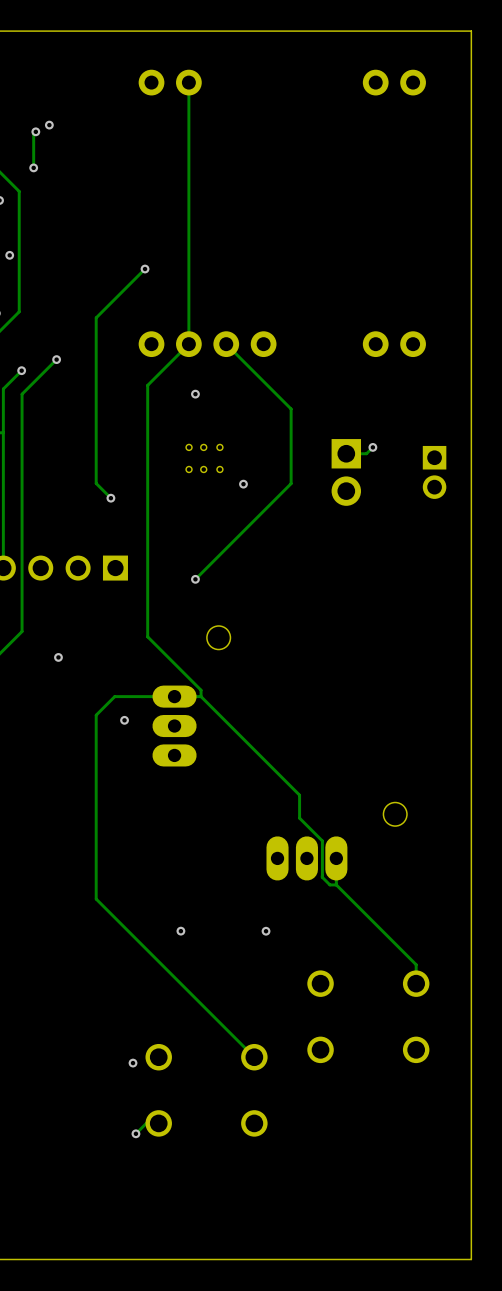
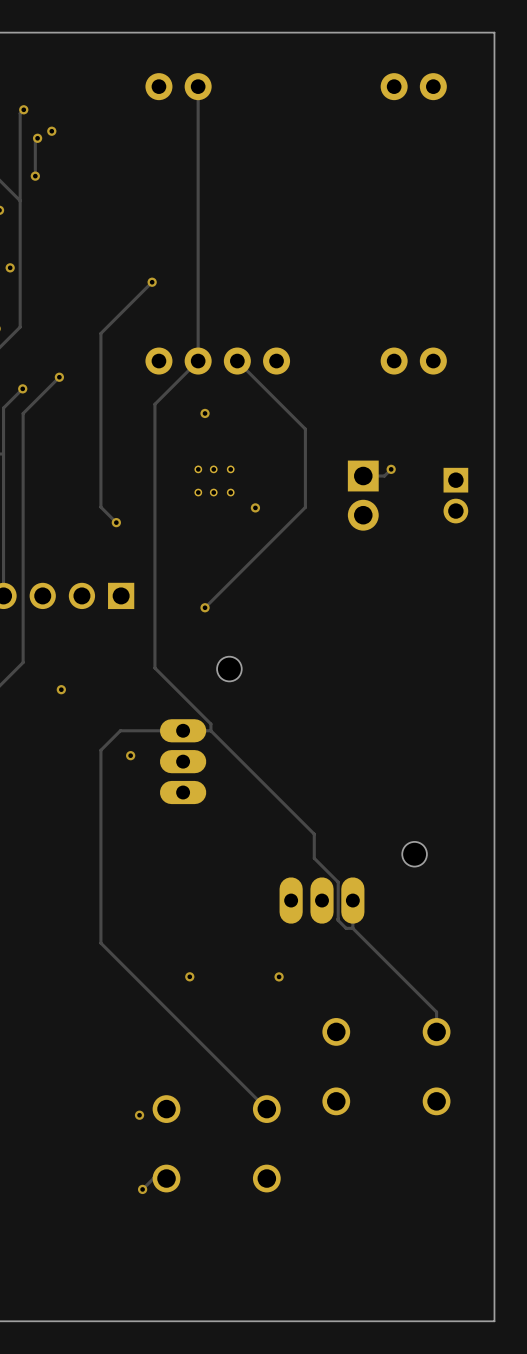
track: none -> (23, 109) (20, 113) (20, 200)
via: none -> (23, 109)

